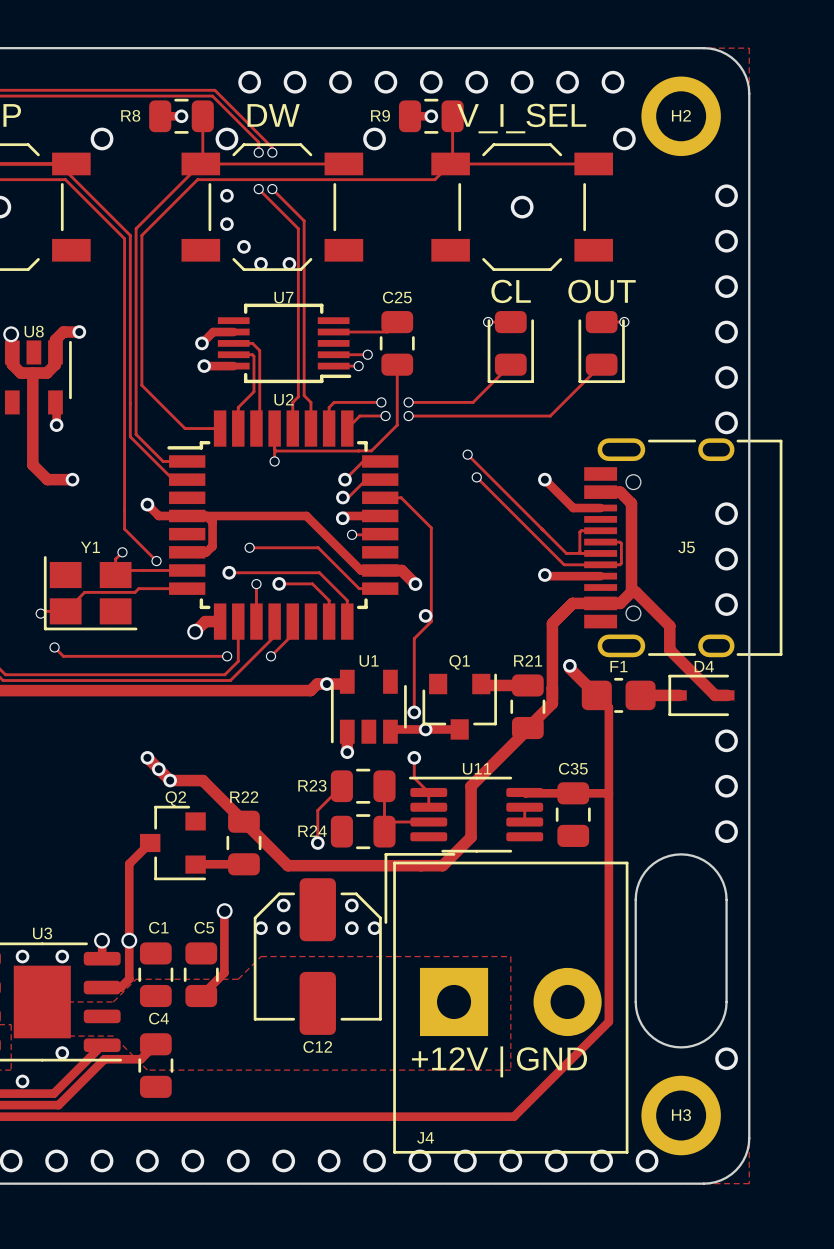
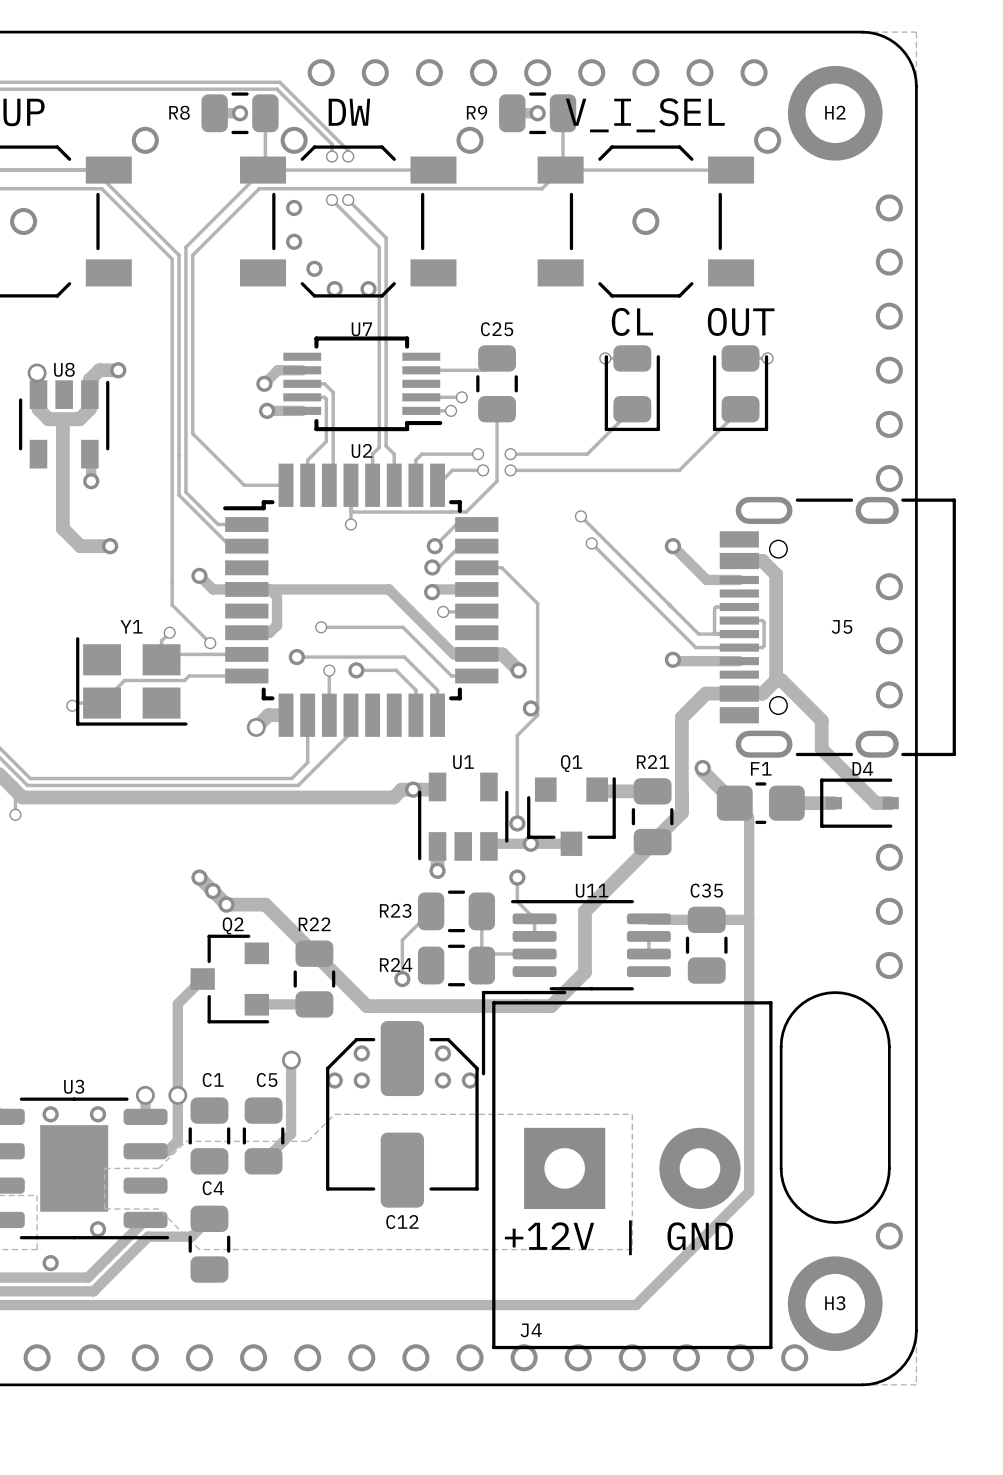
track: (292, 621) (292, 634) (270, 656) -> none
track: (54, 647) (63, 656) (227, 656) -> none
via: (54, 647) -> none
via: (227, 656) -> none
via: (270, 656) -> none

